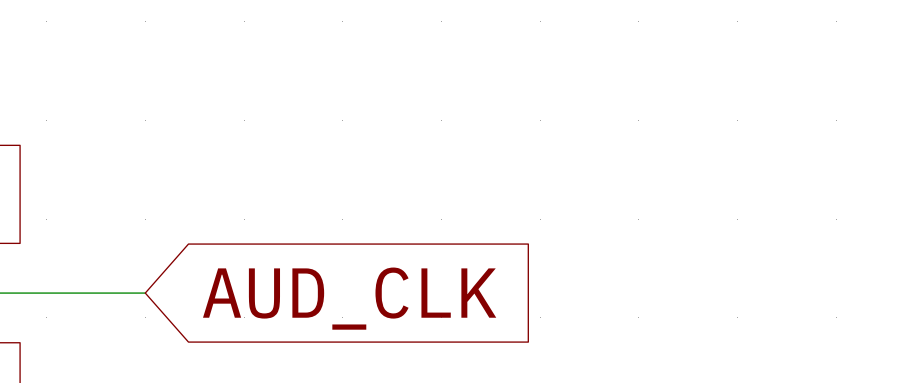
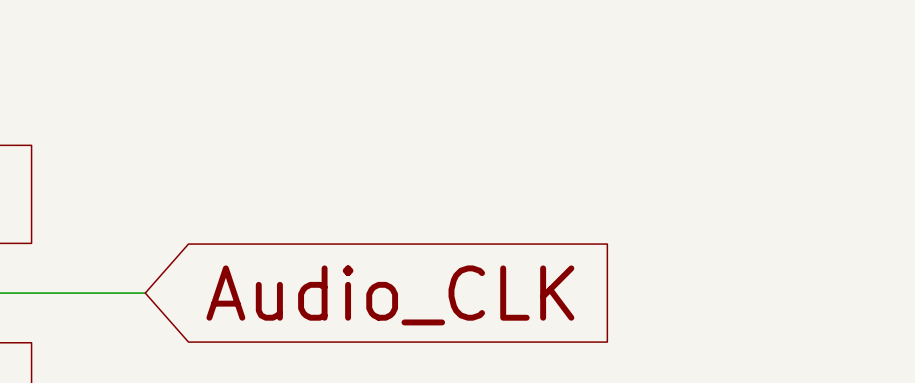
global label: AUD_CLK (349, 298) -> Audio_CLK (390, 295)

